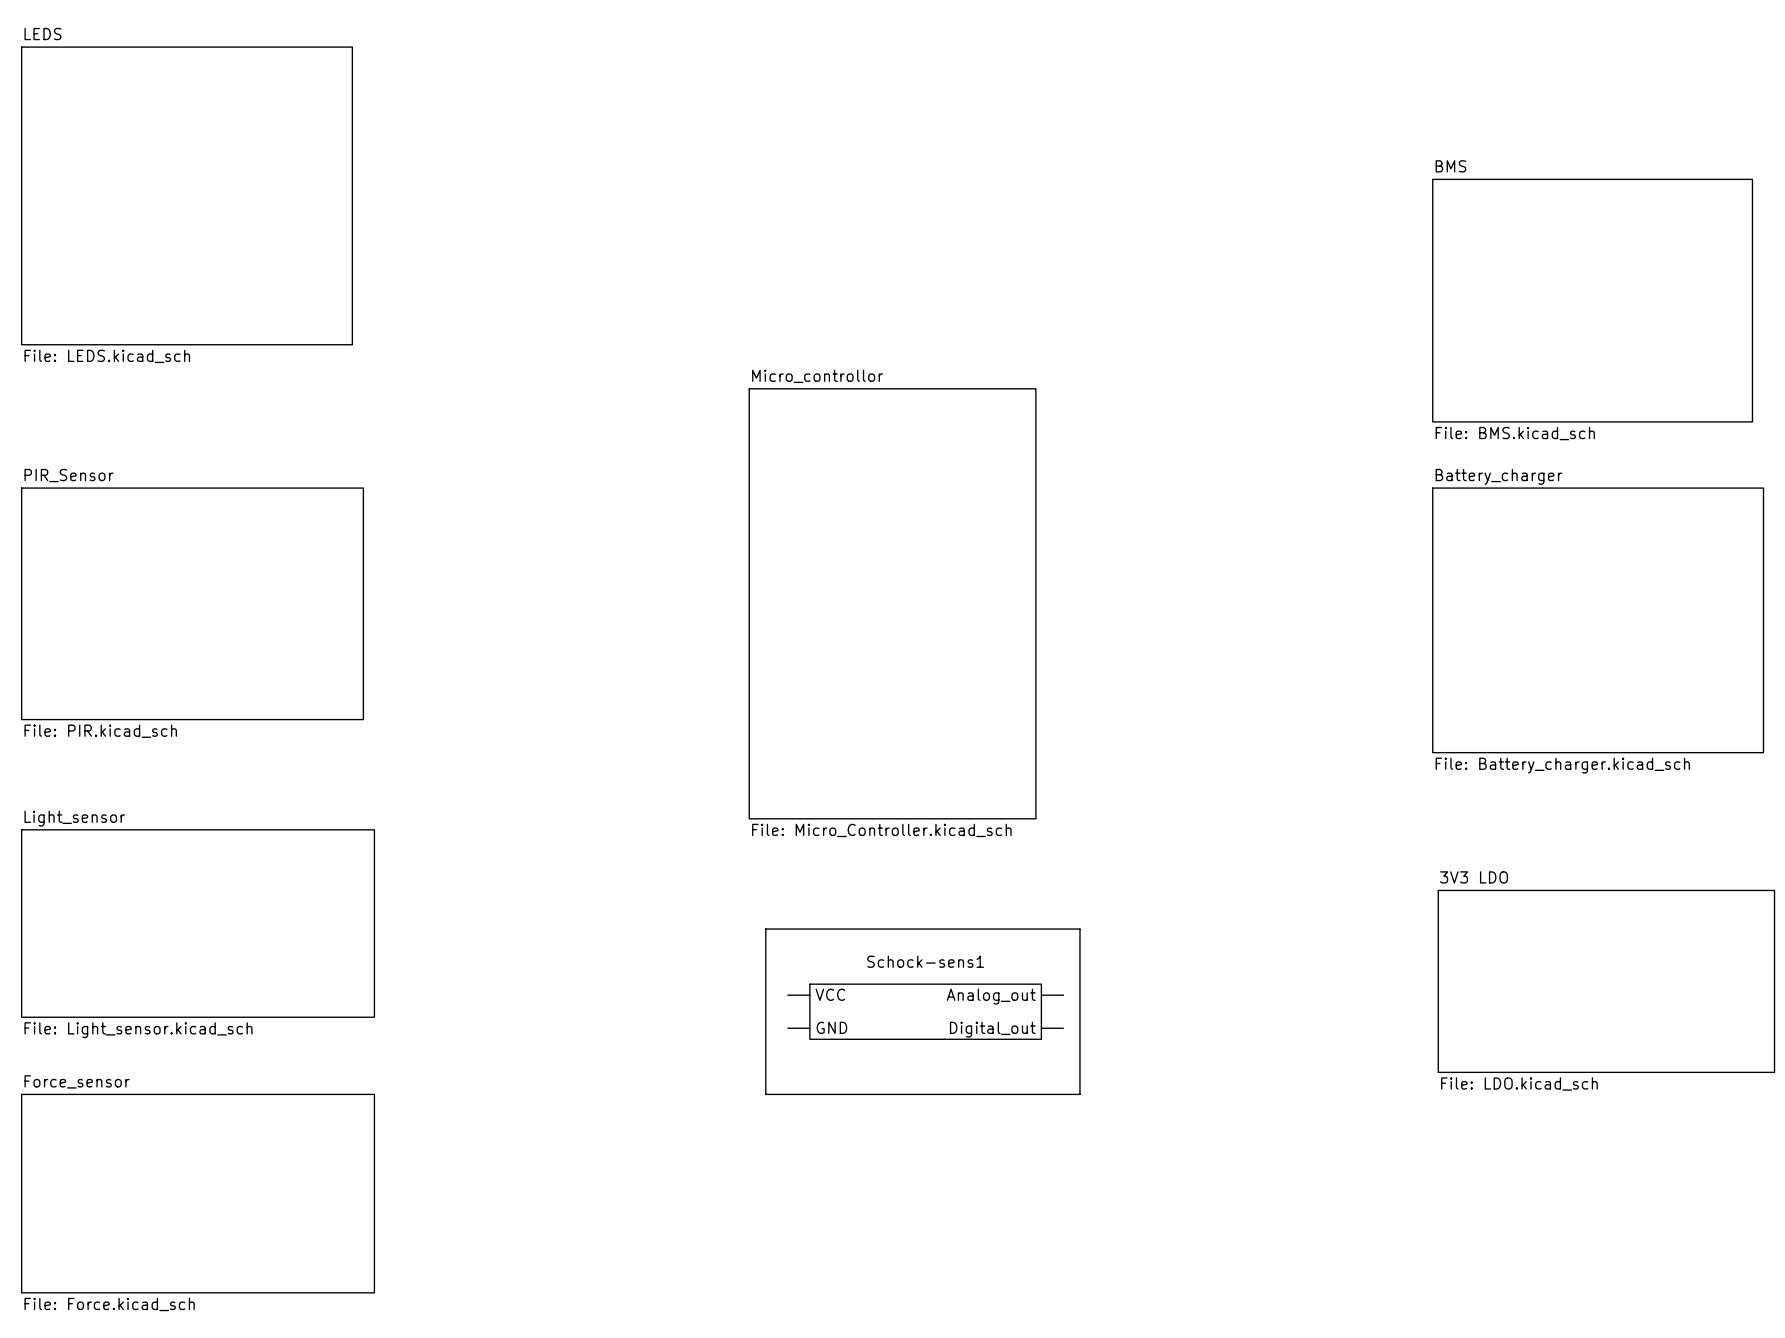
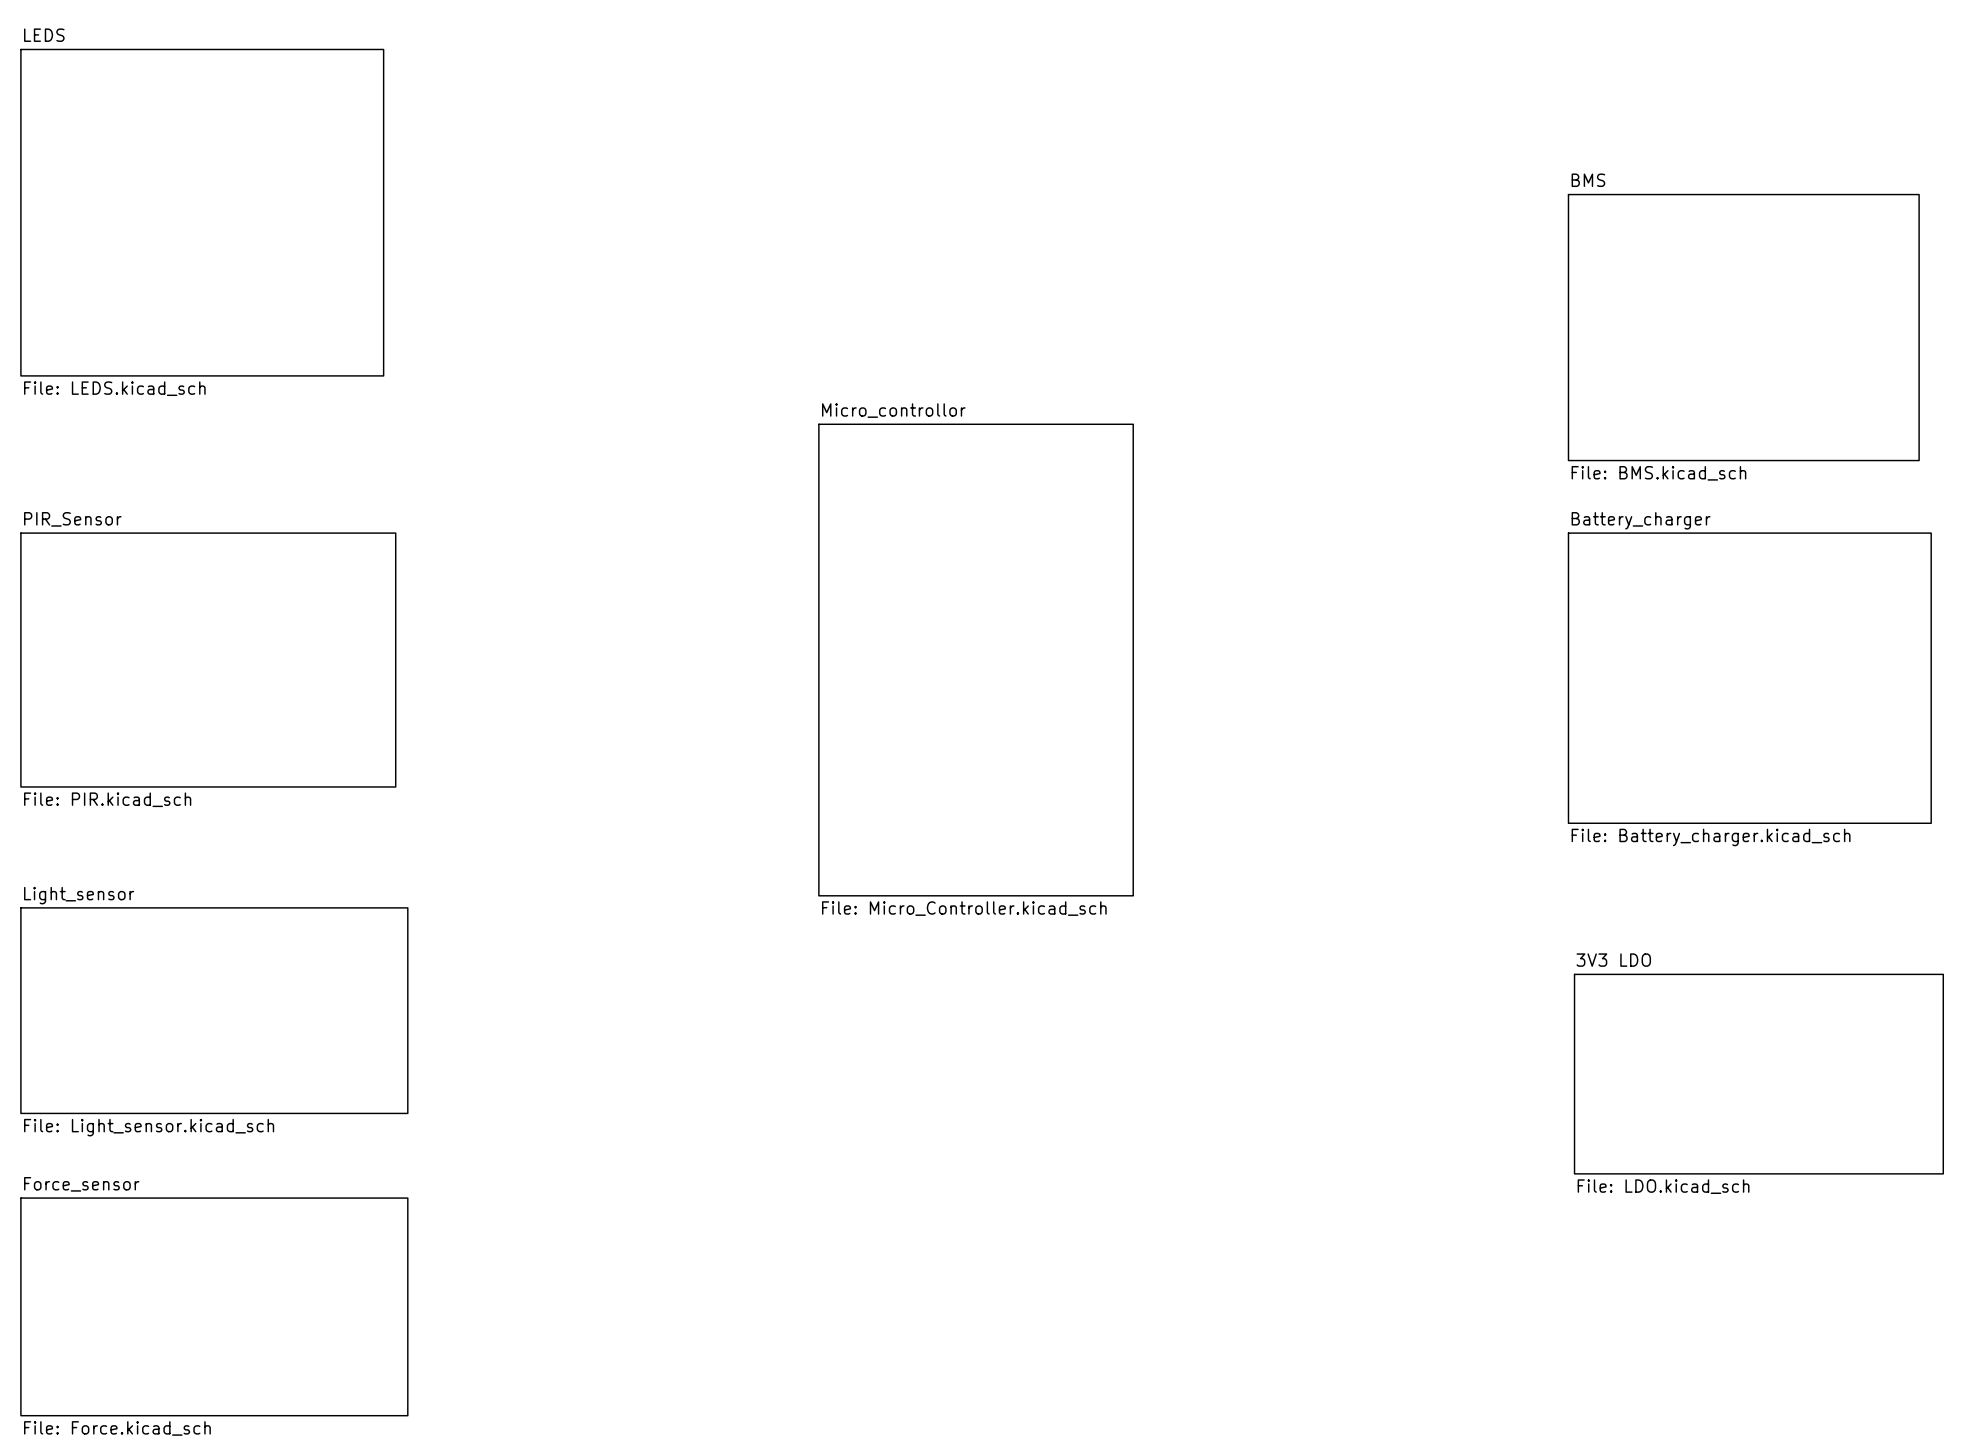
line: (765, 929) (1079, 929) (1079, 1094) (765, 1094) (765, 929) -> none
Schock-sens1: (925, 1011) -> none

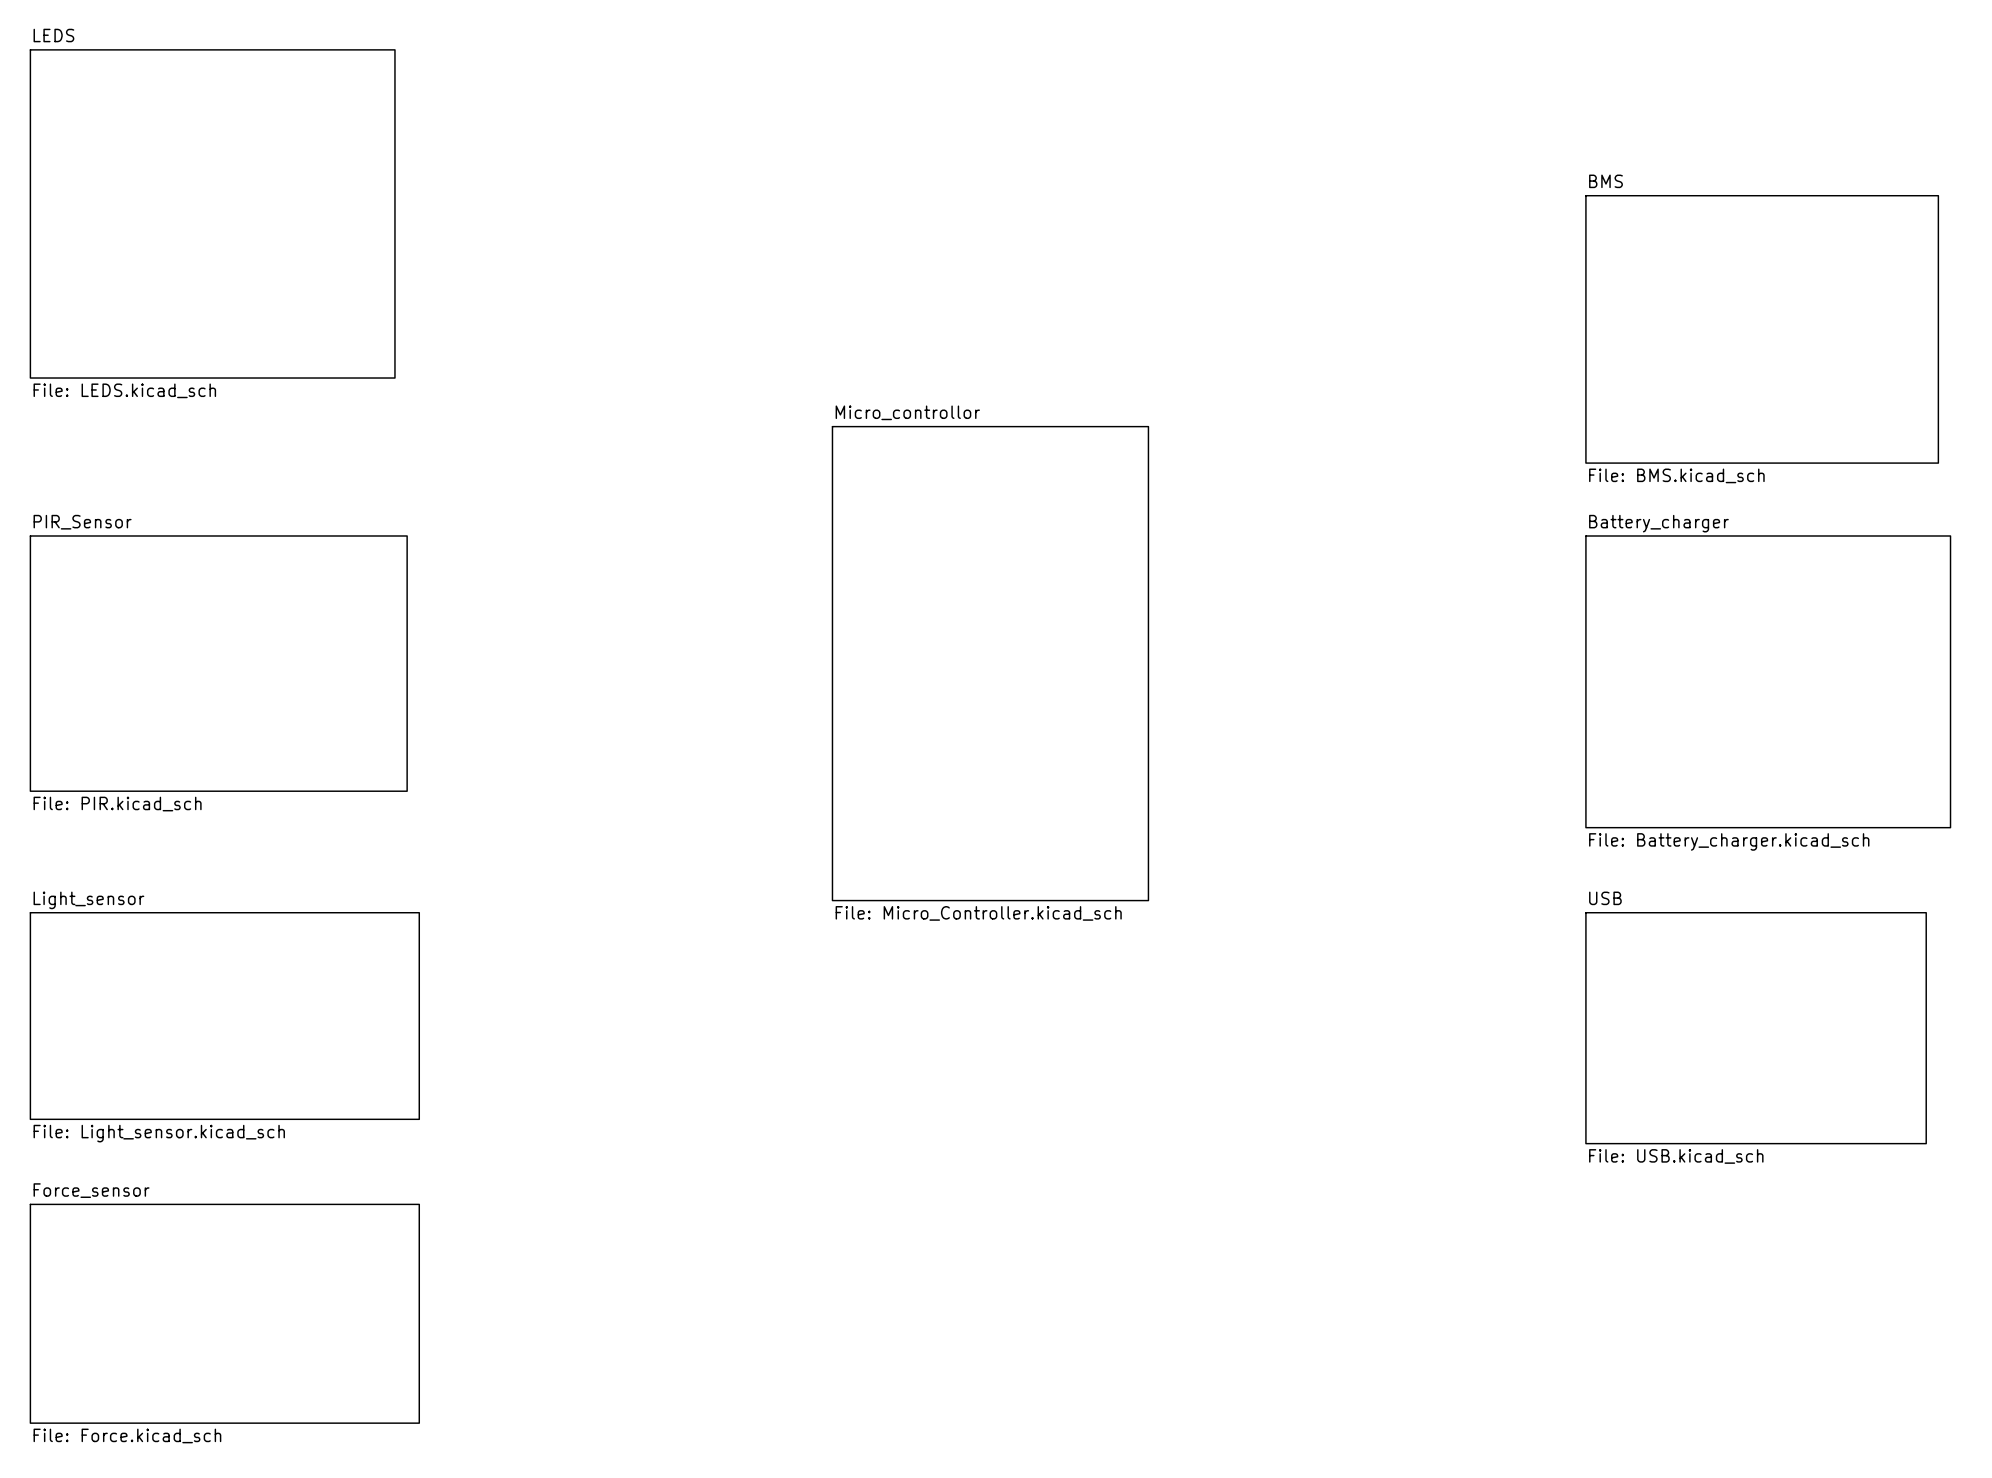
sheet USB: none -> File: USB.kicad_sch (1756, 1028)
sheet 3V3 LDO: File: LDO.kicad_sch (1758, 1074) -> none

